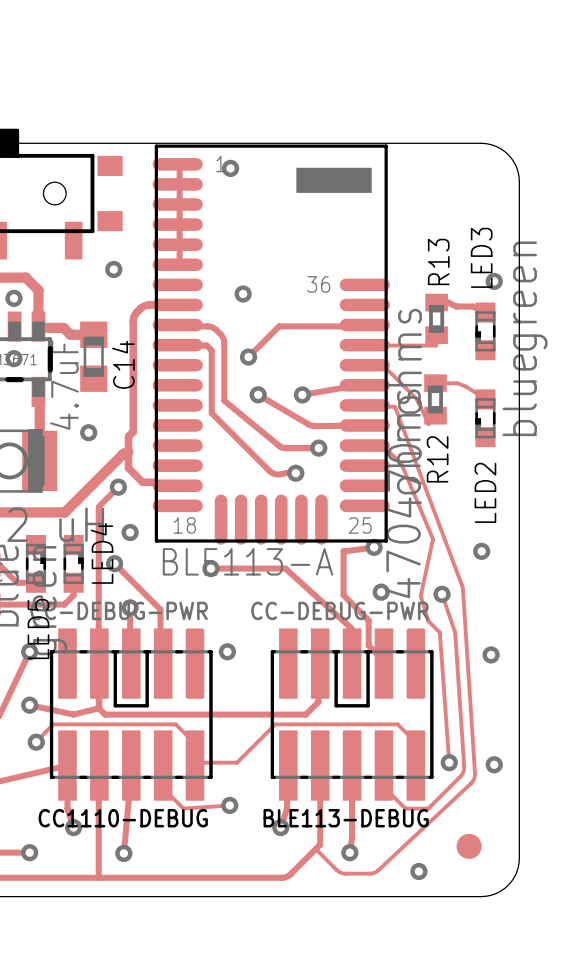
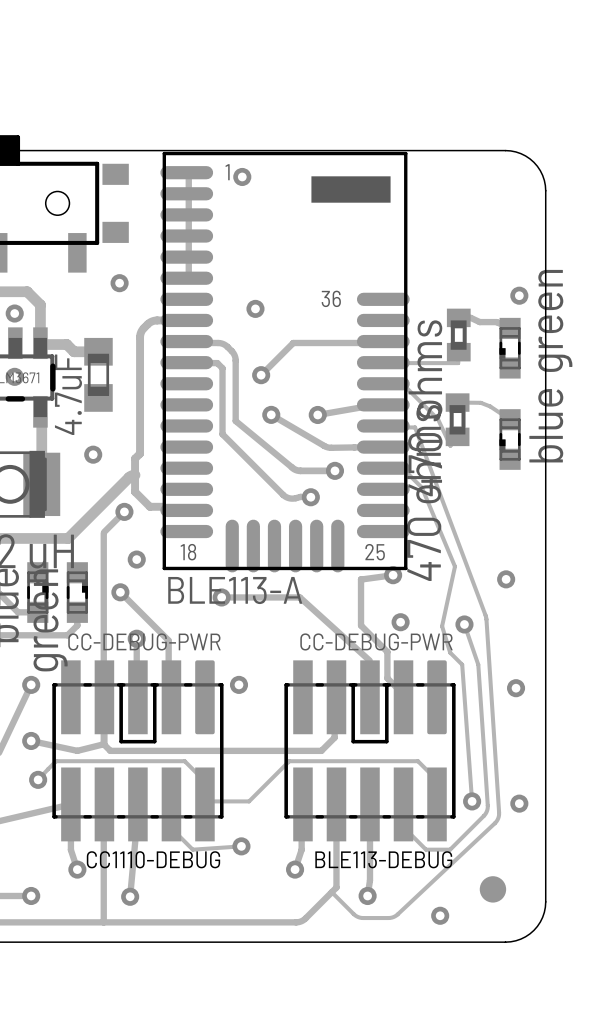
LED3 name: LED3 (481, 257) -> none
R13 name: R13 (438, 261) -> none
C14 name: C14 (123, 364) -> none
R12 name: R12 (437, 459) -> none
LED2 name: LED2 (485, 492) -> none
LED4 name: LED4 (102, 553) -> none
LED5 name: LED5 (38, 629) -> none

